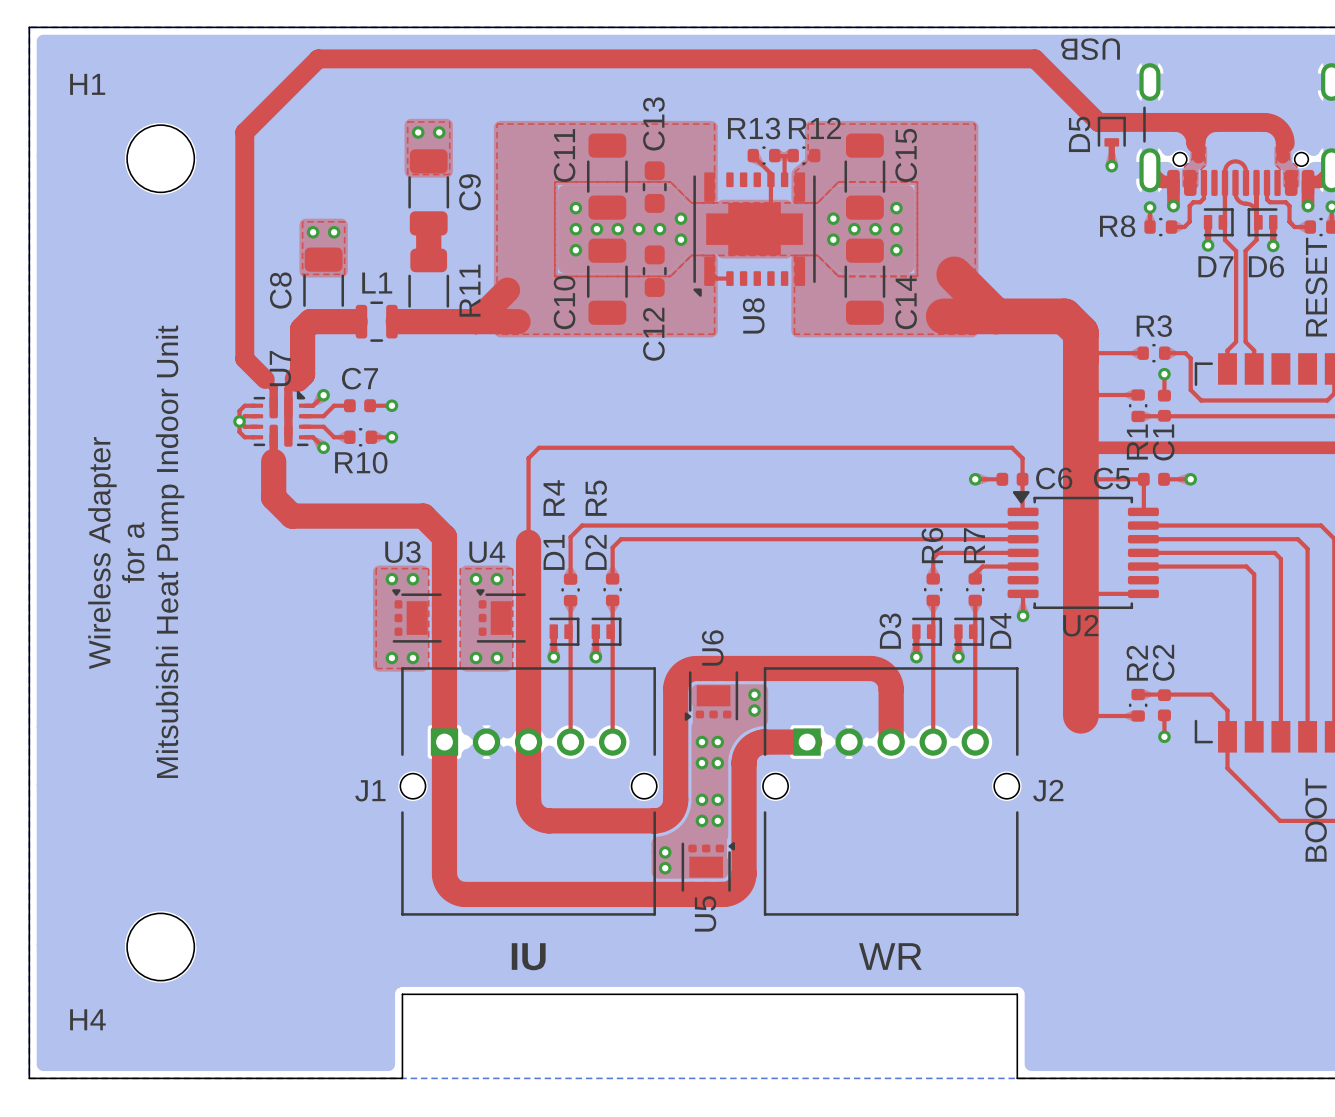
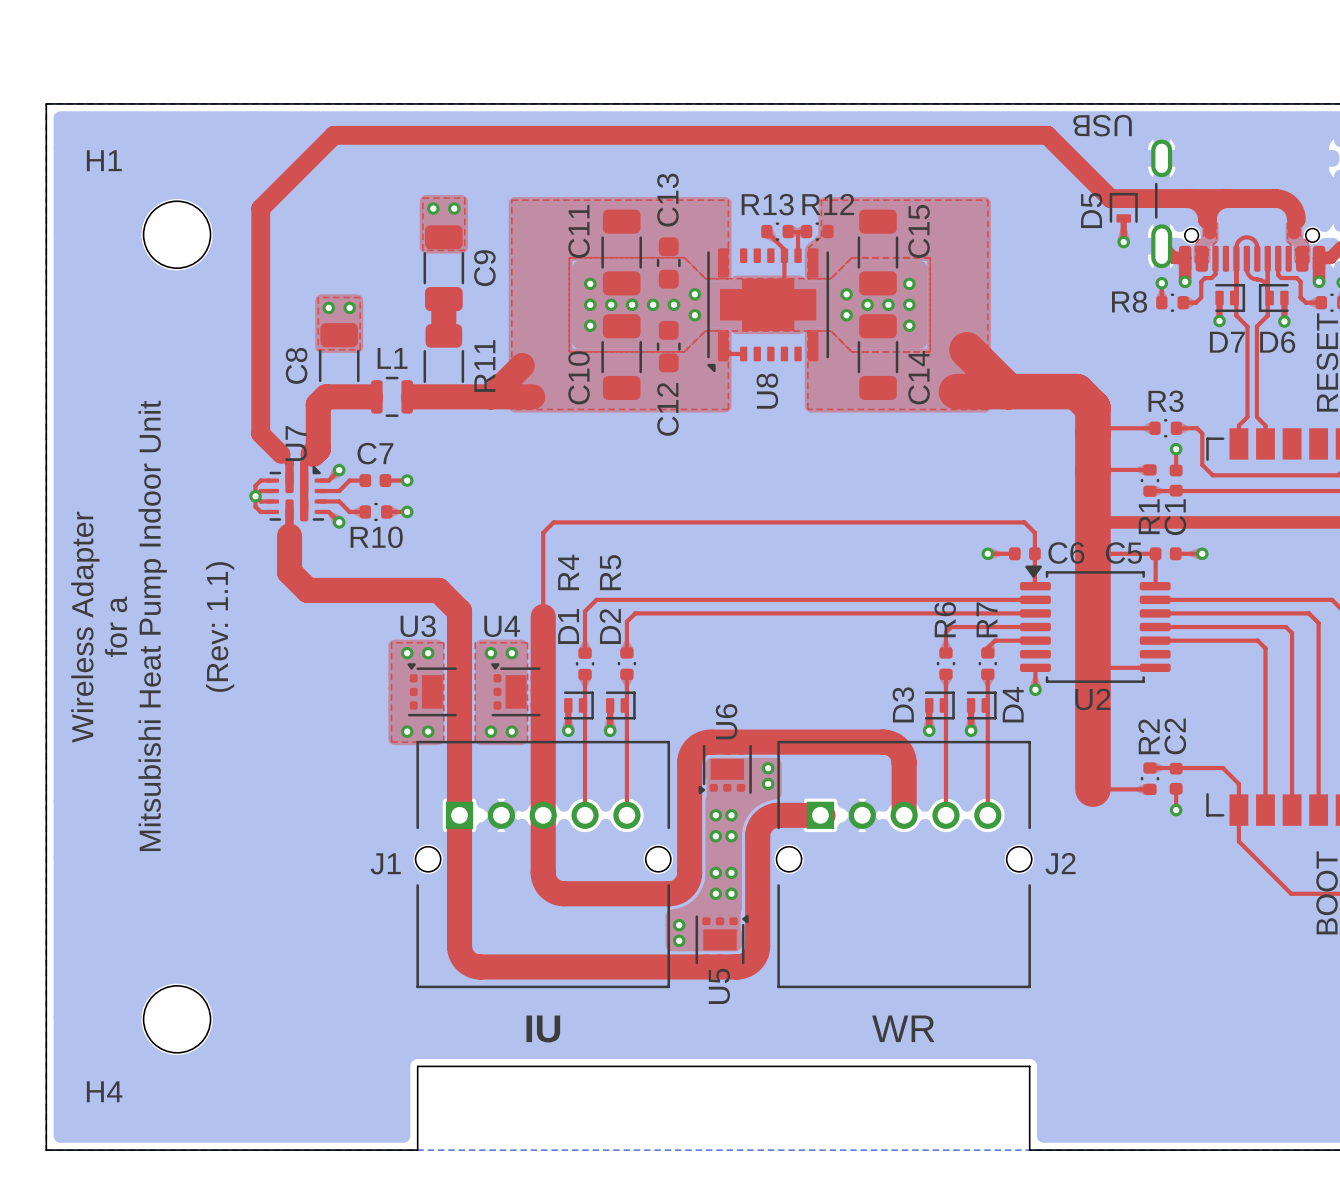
text: Mitsubishi Heat Pump Indoor Unit (170, 551) -> none
text: for a (133, 552) -> Mitsubishi Heat Pump Indoor Unit (152, 625)
text: none -> (Rev: 1.1) (220, 627)
text: none -> Wireless Adapter (85, 627)
text: Wireless Adapter (102, 553) -> for a (116, 626)

